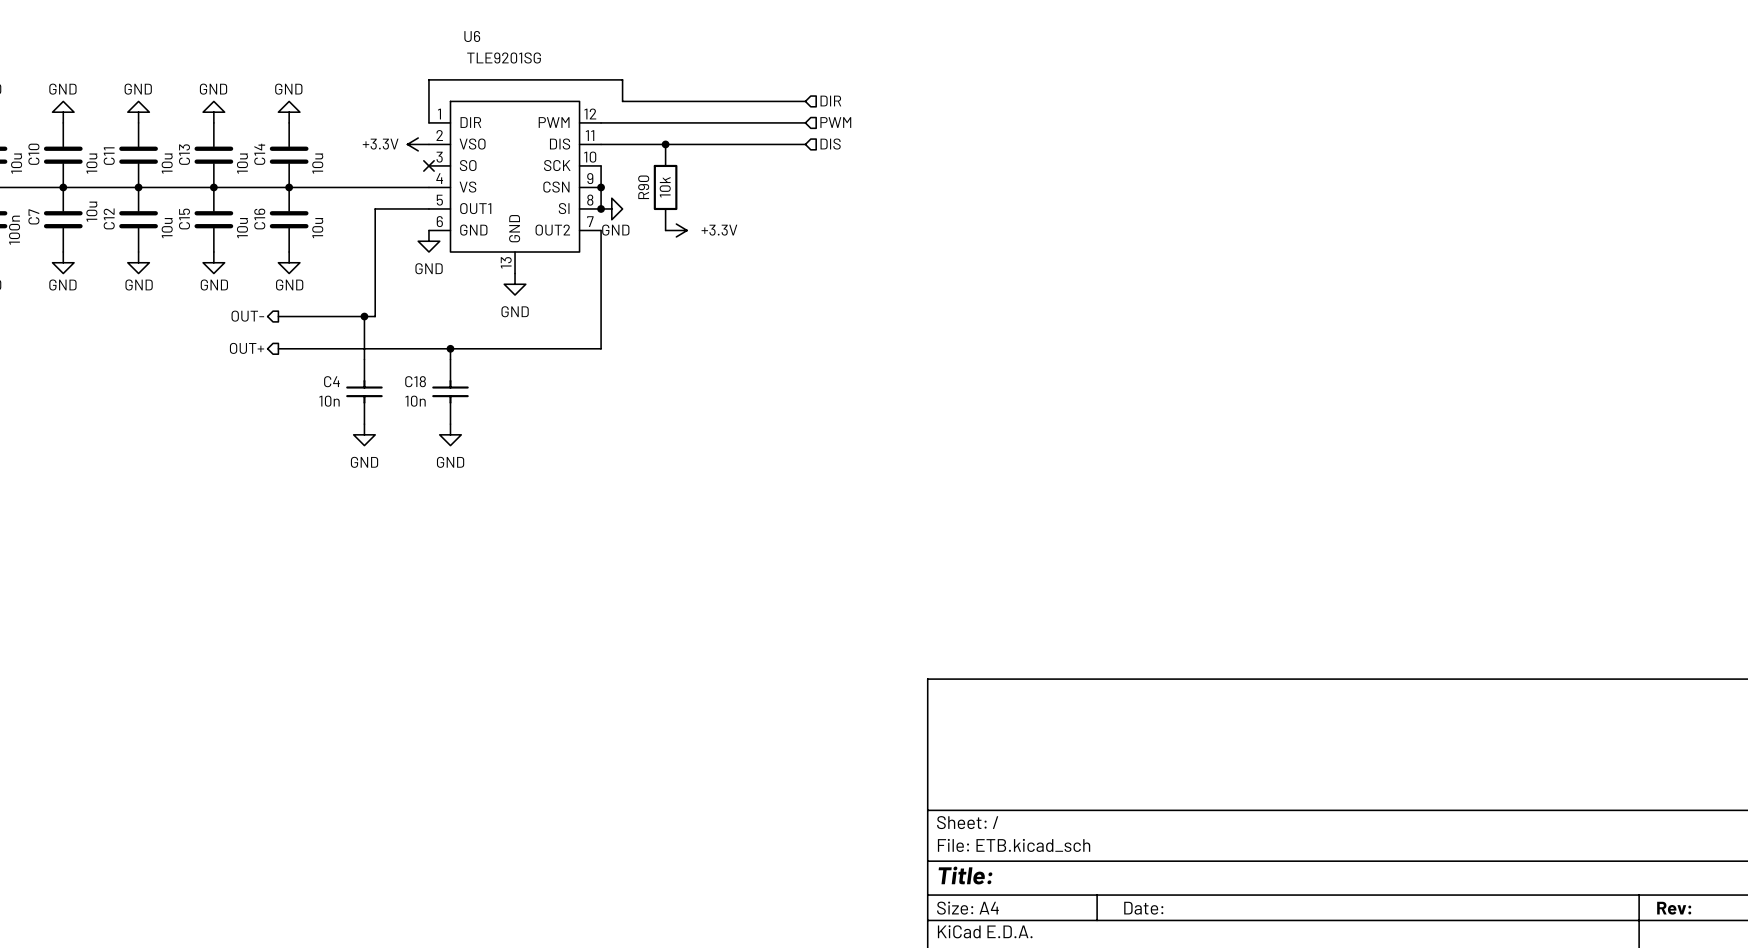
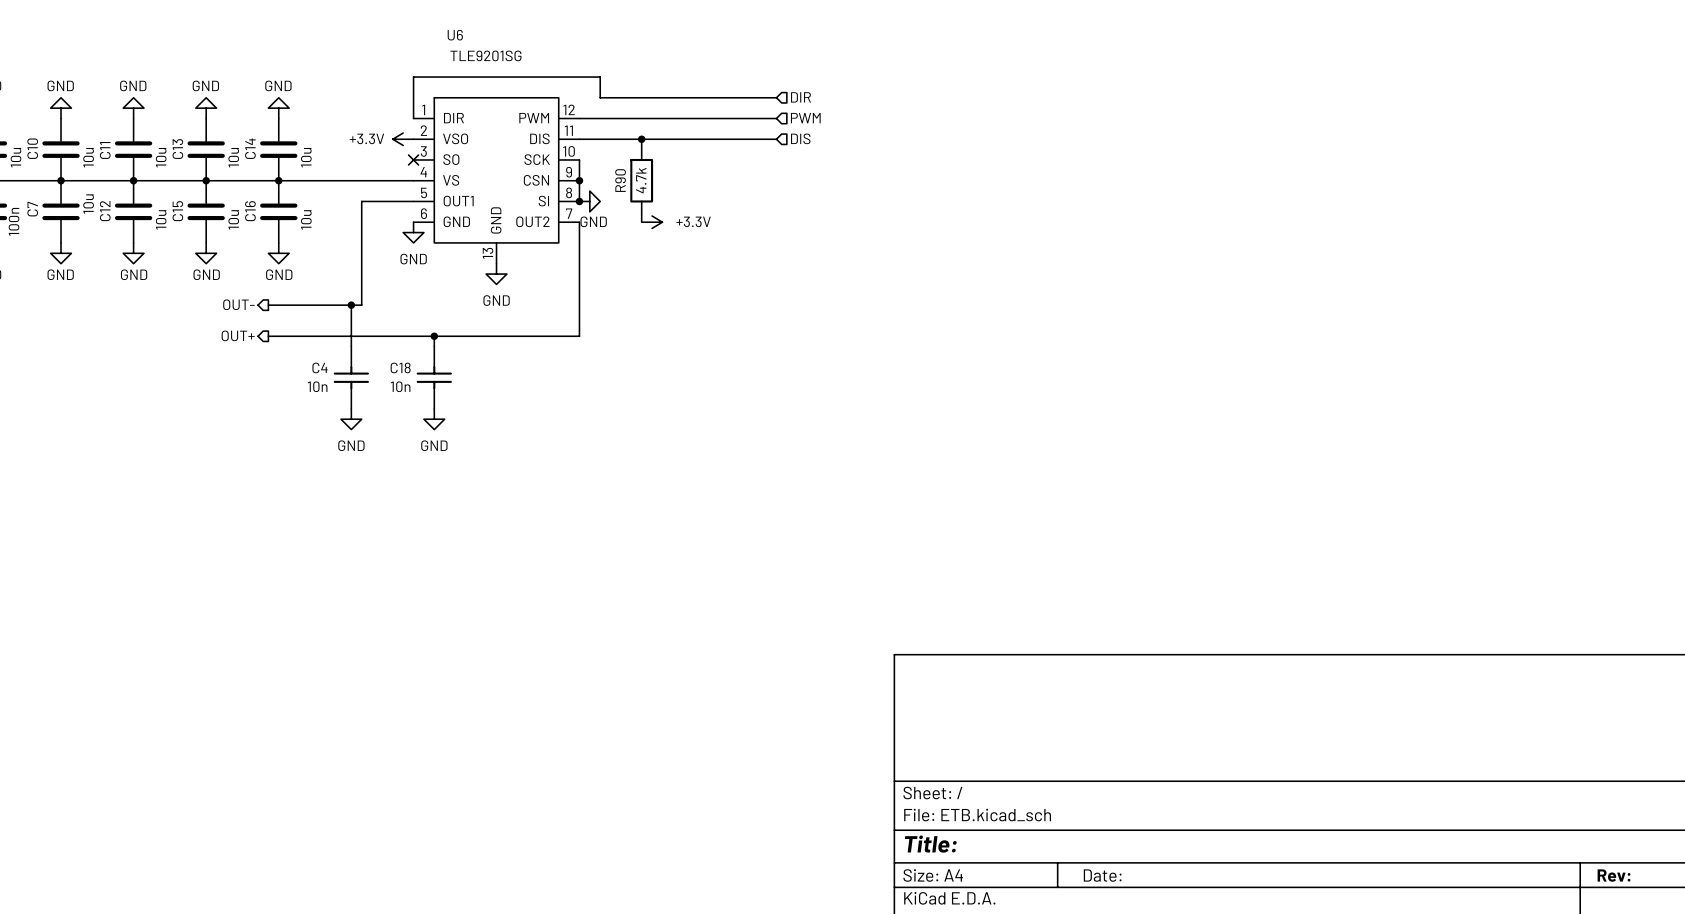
R90 value: 10k (665, 187) -> 4.7k (641, 180)

